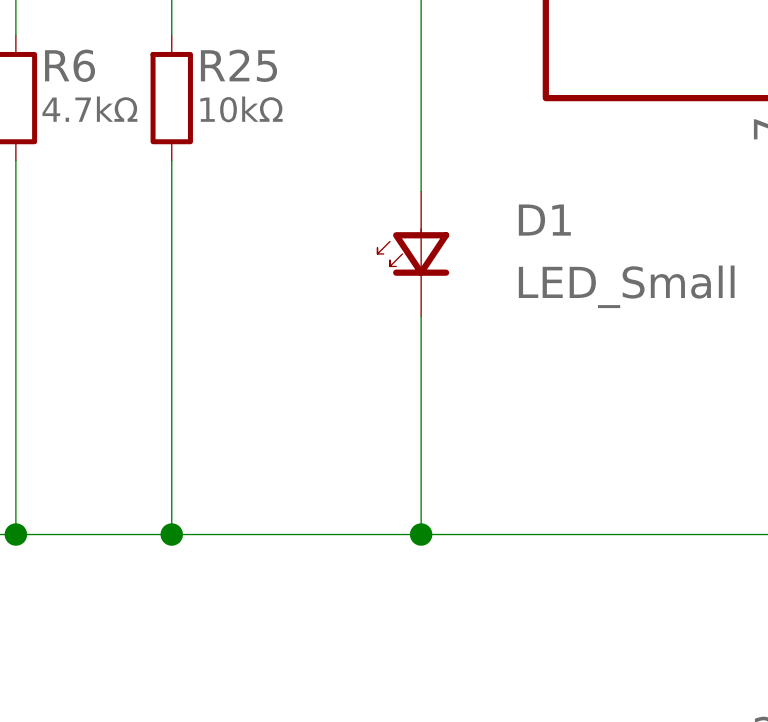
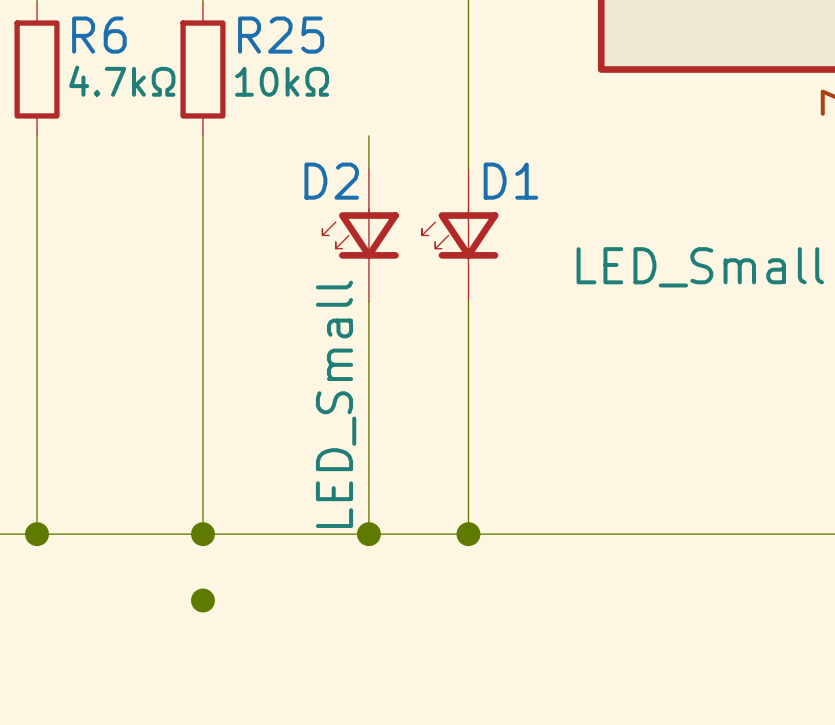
wire: none -> (368, 135) (368, 169)
D1 name position: D1 (544, 220) -> D1 (510, 181)
D2: none -> LED_Small (360, 235)
wire: none -> (368, 301) (368, 534)
junction: none -> (368, 534)
junction: none -> (202, 600)

